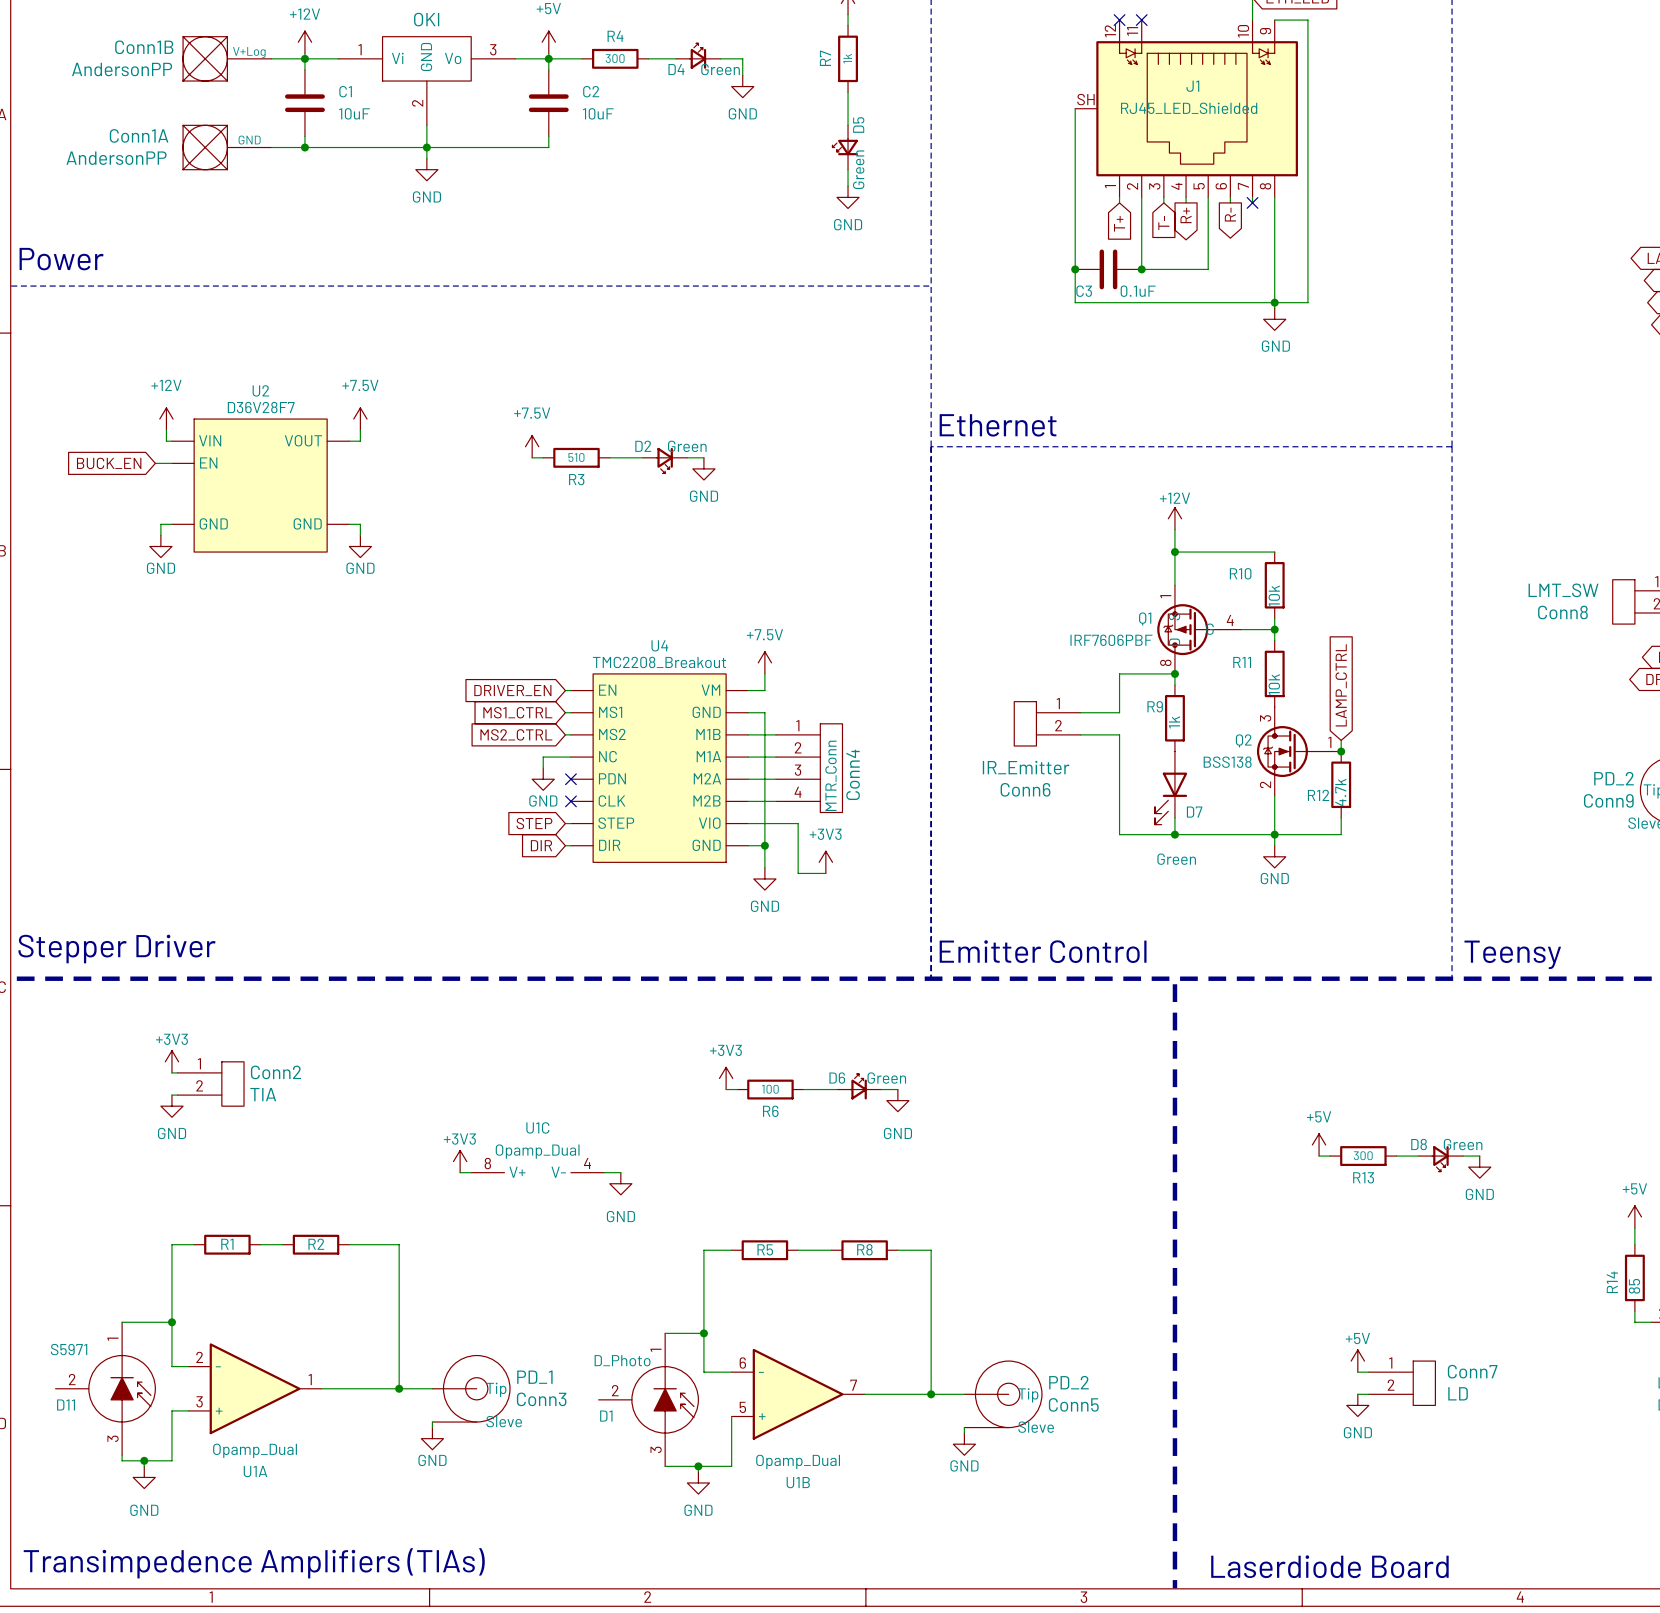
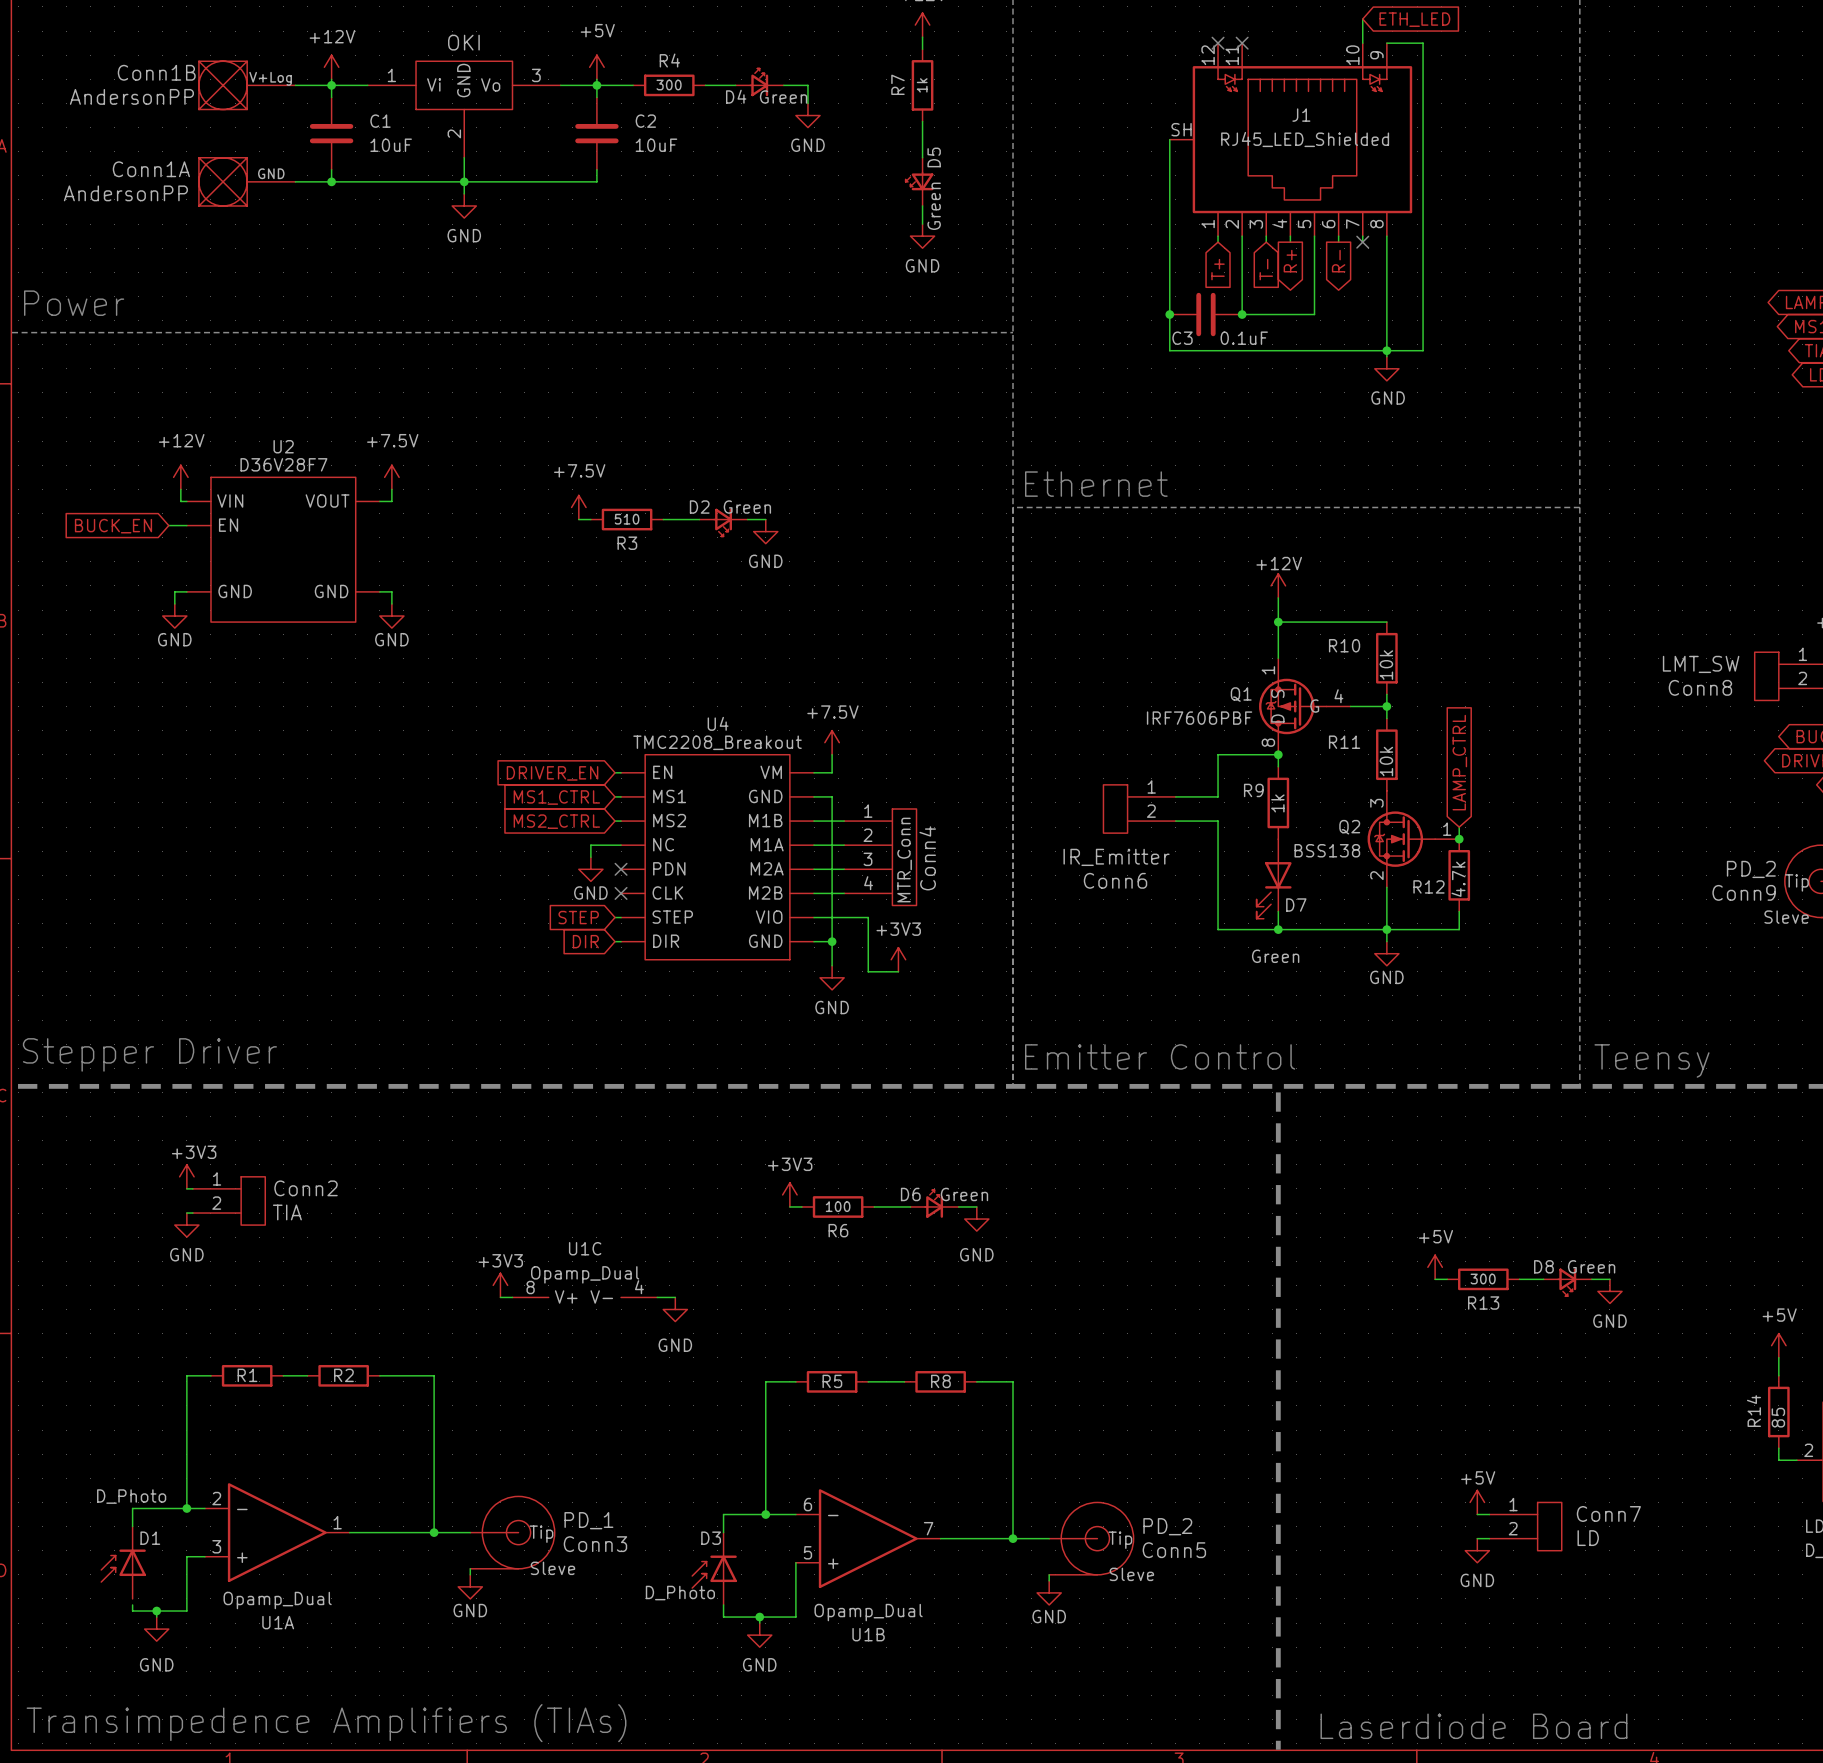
wire: (122, 1322) (171, 1322) -> none
junction position: (171, 1322) -> (186, 1508)
D1 symbol: [598, 1333, 699, 1467] -> [101, 1526, 146, 1599]
wire: (665, 1333) (703, 1333) -> none
junction position: (703, 1333) -> (765, 1514)
D1 value position: D_Photo (622, 1360) -> D_Photo (131, 1496)
wire: none -> (186, 1508) (132, 1508) (132, 1526)
wire: none -> (765, 1514) (723, 1514) (723, 1532)
D11: S5971 (105, 1388) -> none
D1 name position: D1 (606, 1416) -> D1 (150, 1538)
D3: none -> D_Photo (714, 1568)

